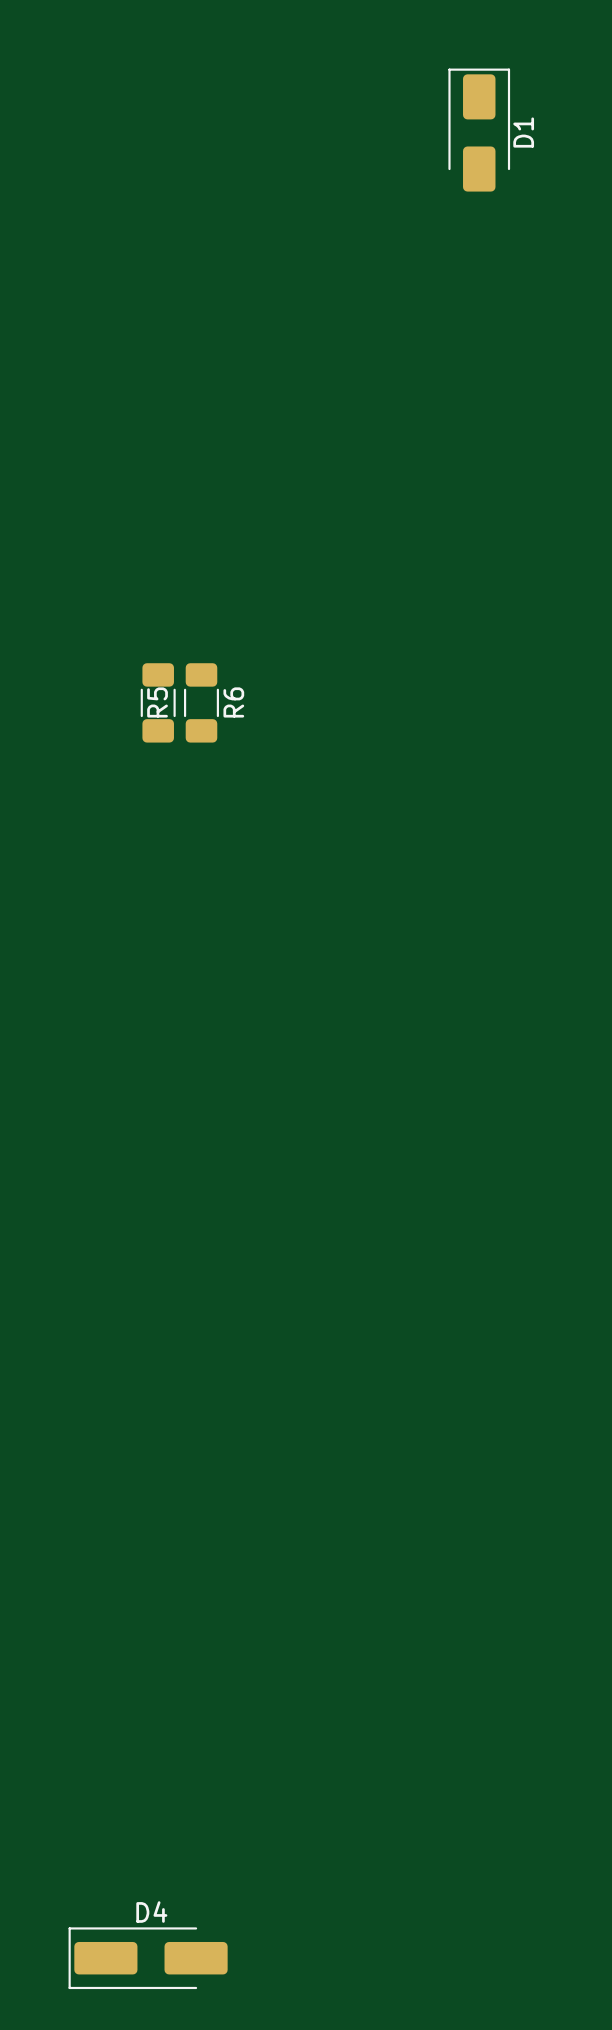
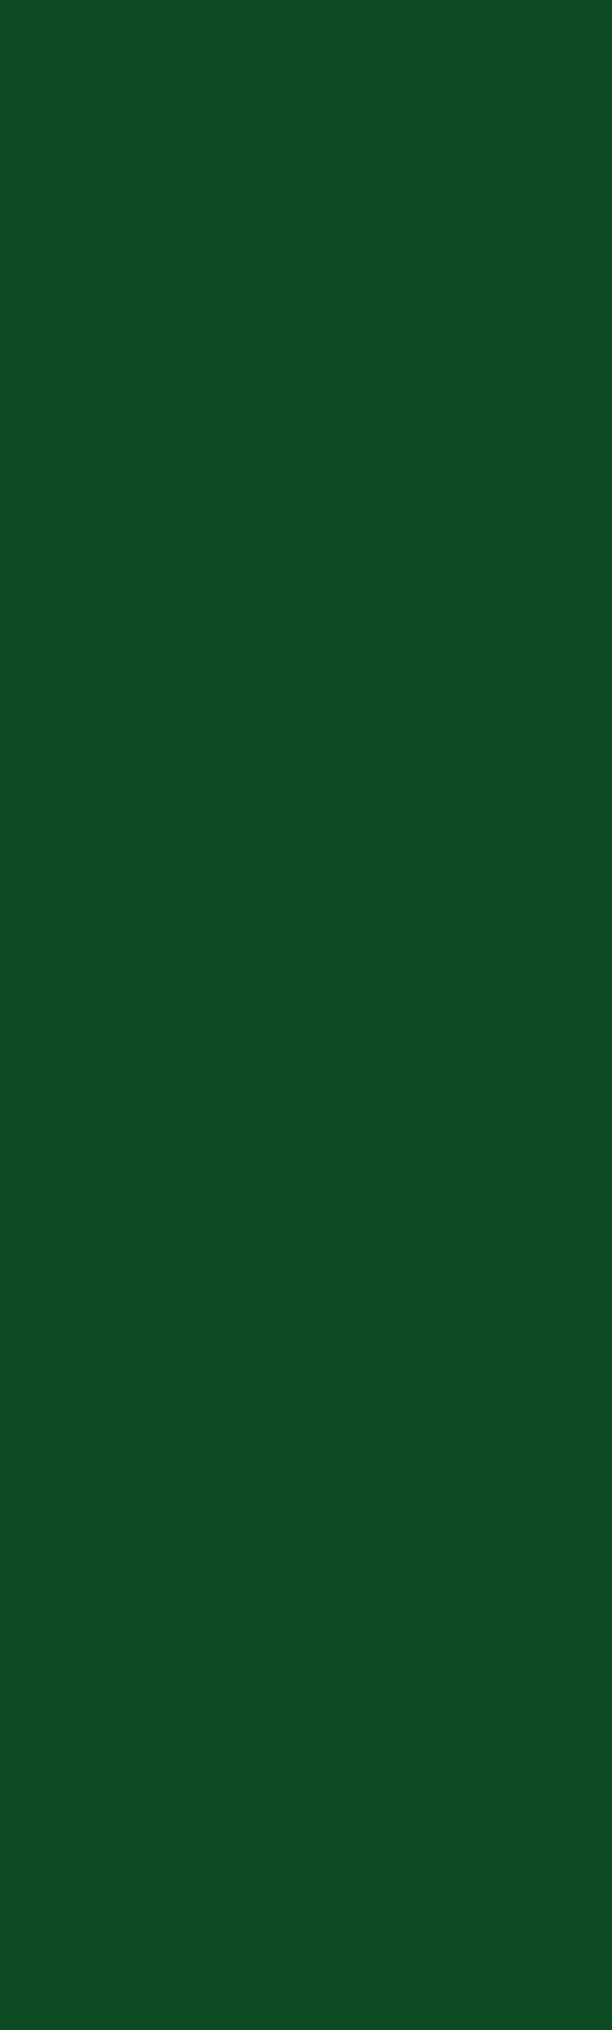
D1: (479, 130) -> none
R5: (158, 702) -> none
R6: (201, 702) -> none
D4: (148, 1958) -> none

